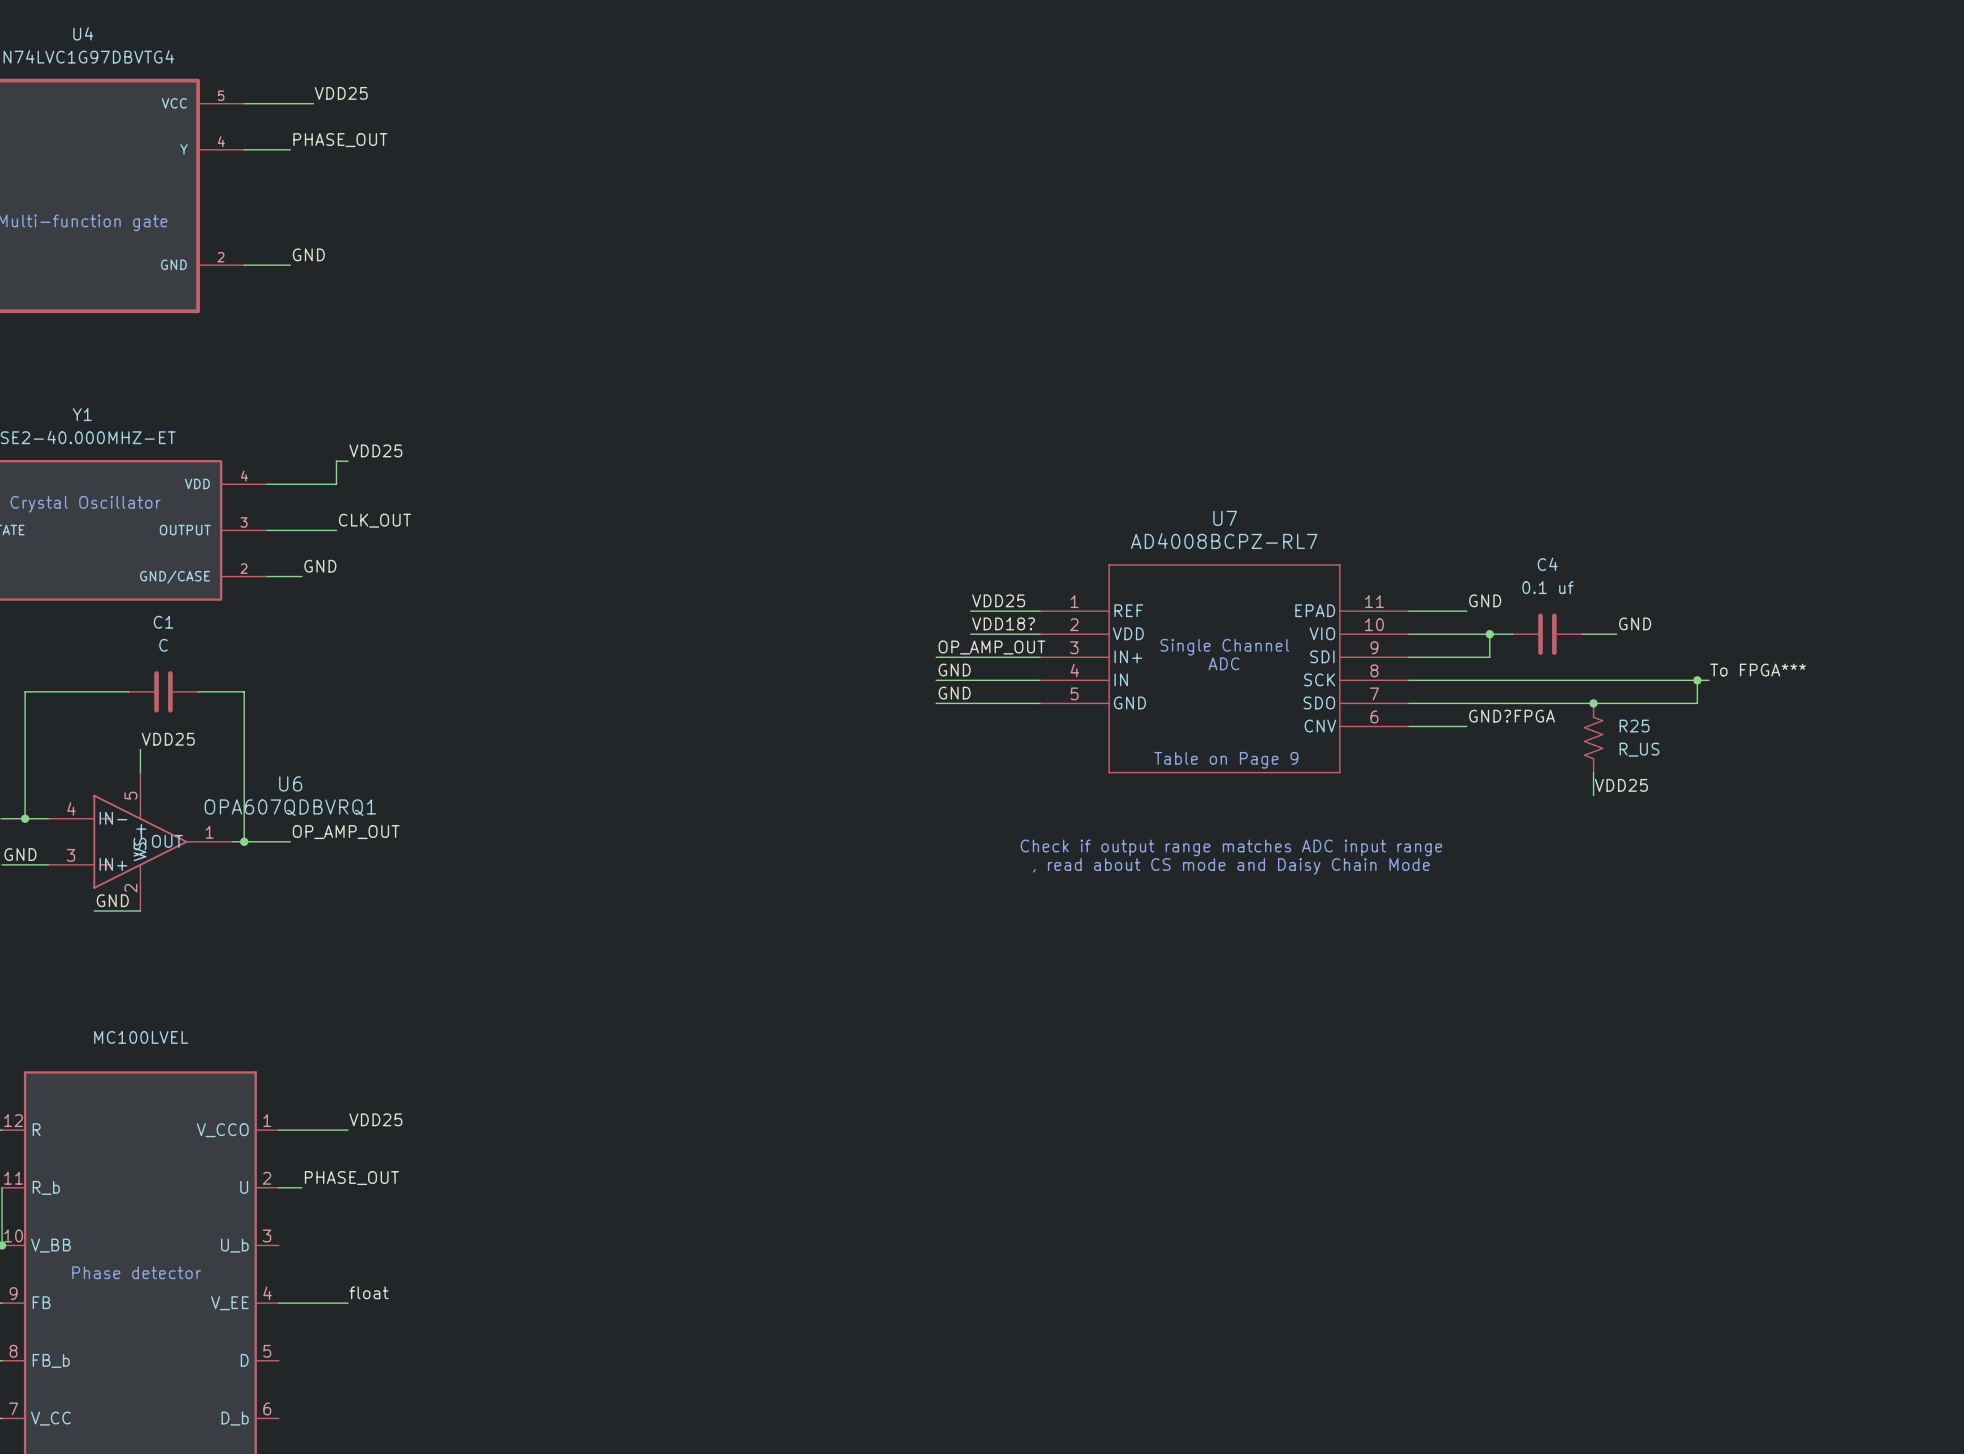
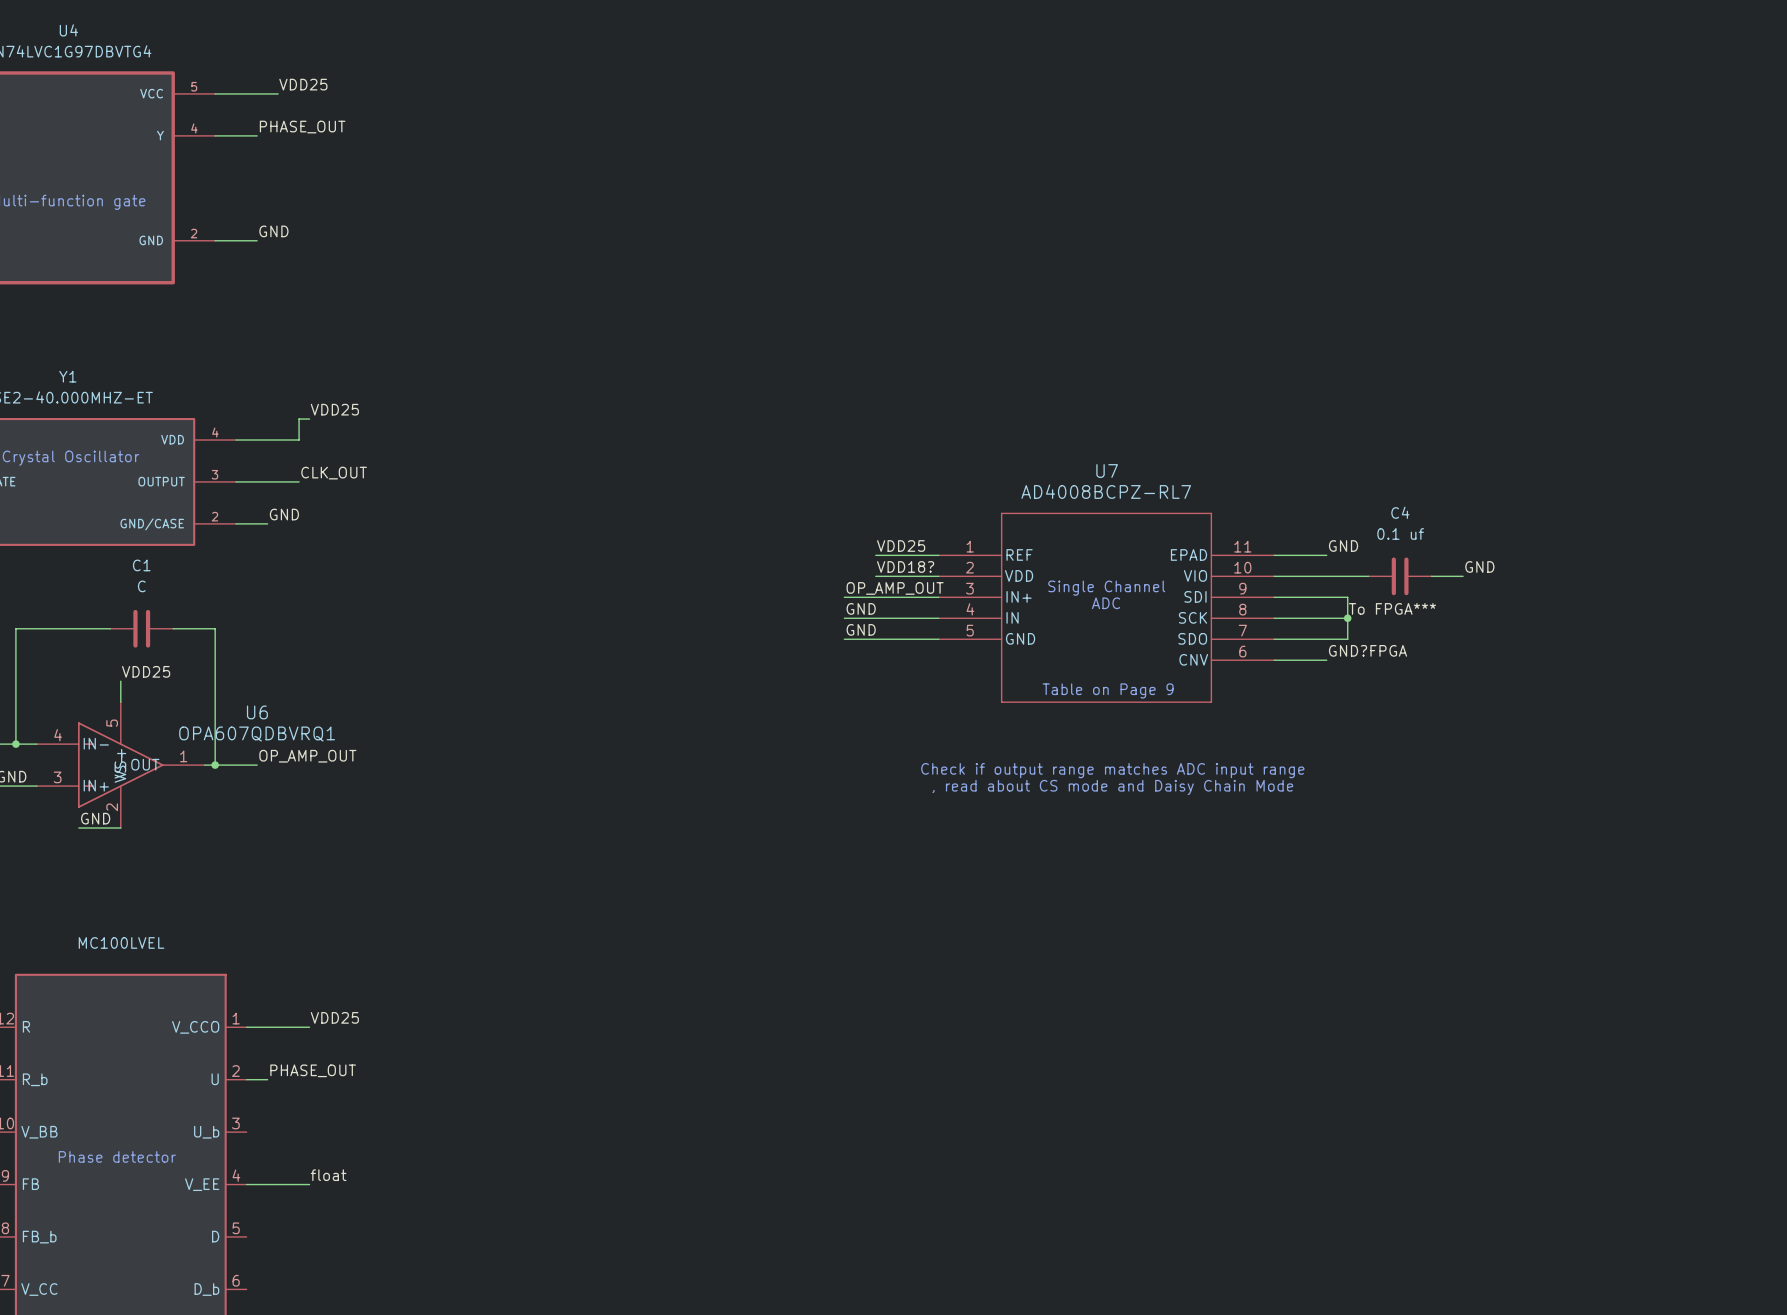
wire: (1489, 634) (1489, 657) -> (1347, 639) (1347, 597)
junction position: (1489, 634) -> (1347, 618)
label position: To FPGA*** (1758, 670) -> To FPGA*** (1392, 608)
wire: (1489, 680) (1708, 680) -> none
wire: (1697, 680) (1697, 703) (1489, 703) -> none
junction: (1697, 680) -> none
junction: (1593, 703) -> none
R25: R_US (1593, 738) -> none
wire: (1593, 772) (1593, 795) -> none
label: VDD25 (1621, 785) -> none

